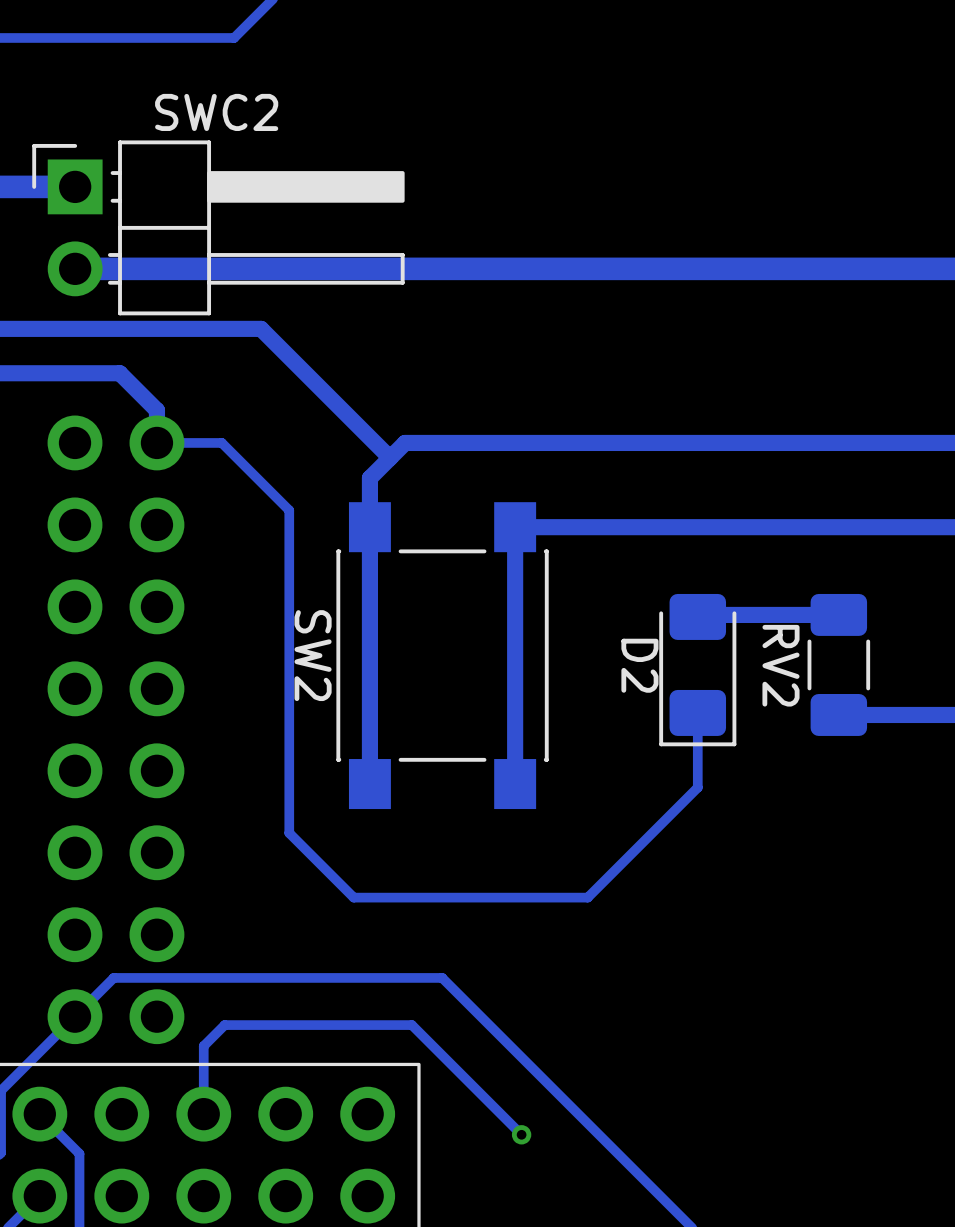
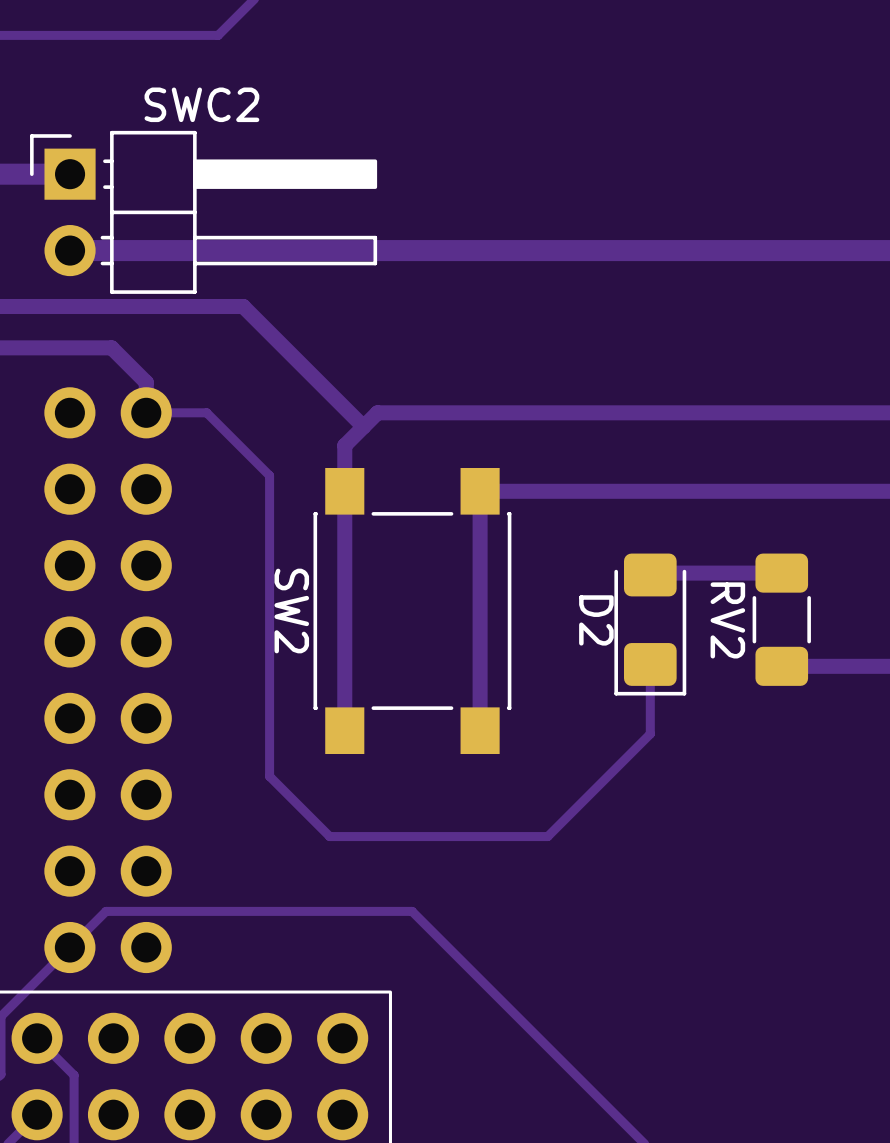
track: (203, 1114) (203, 1046) (224, 1025) (411, 1025) (521, 1134) -> none
via: (521, 1134) -> none

